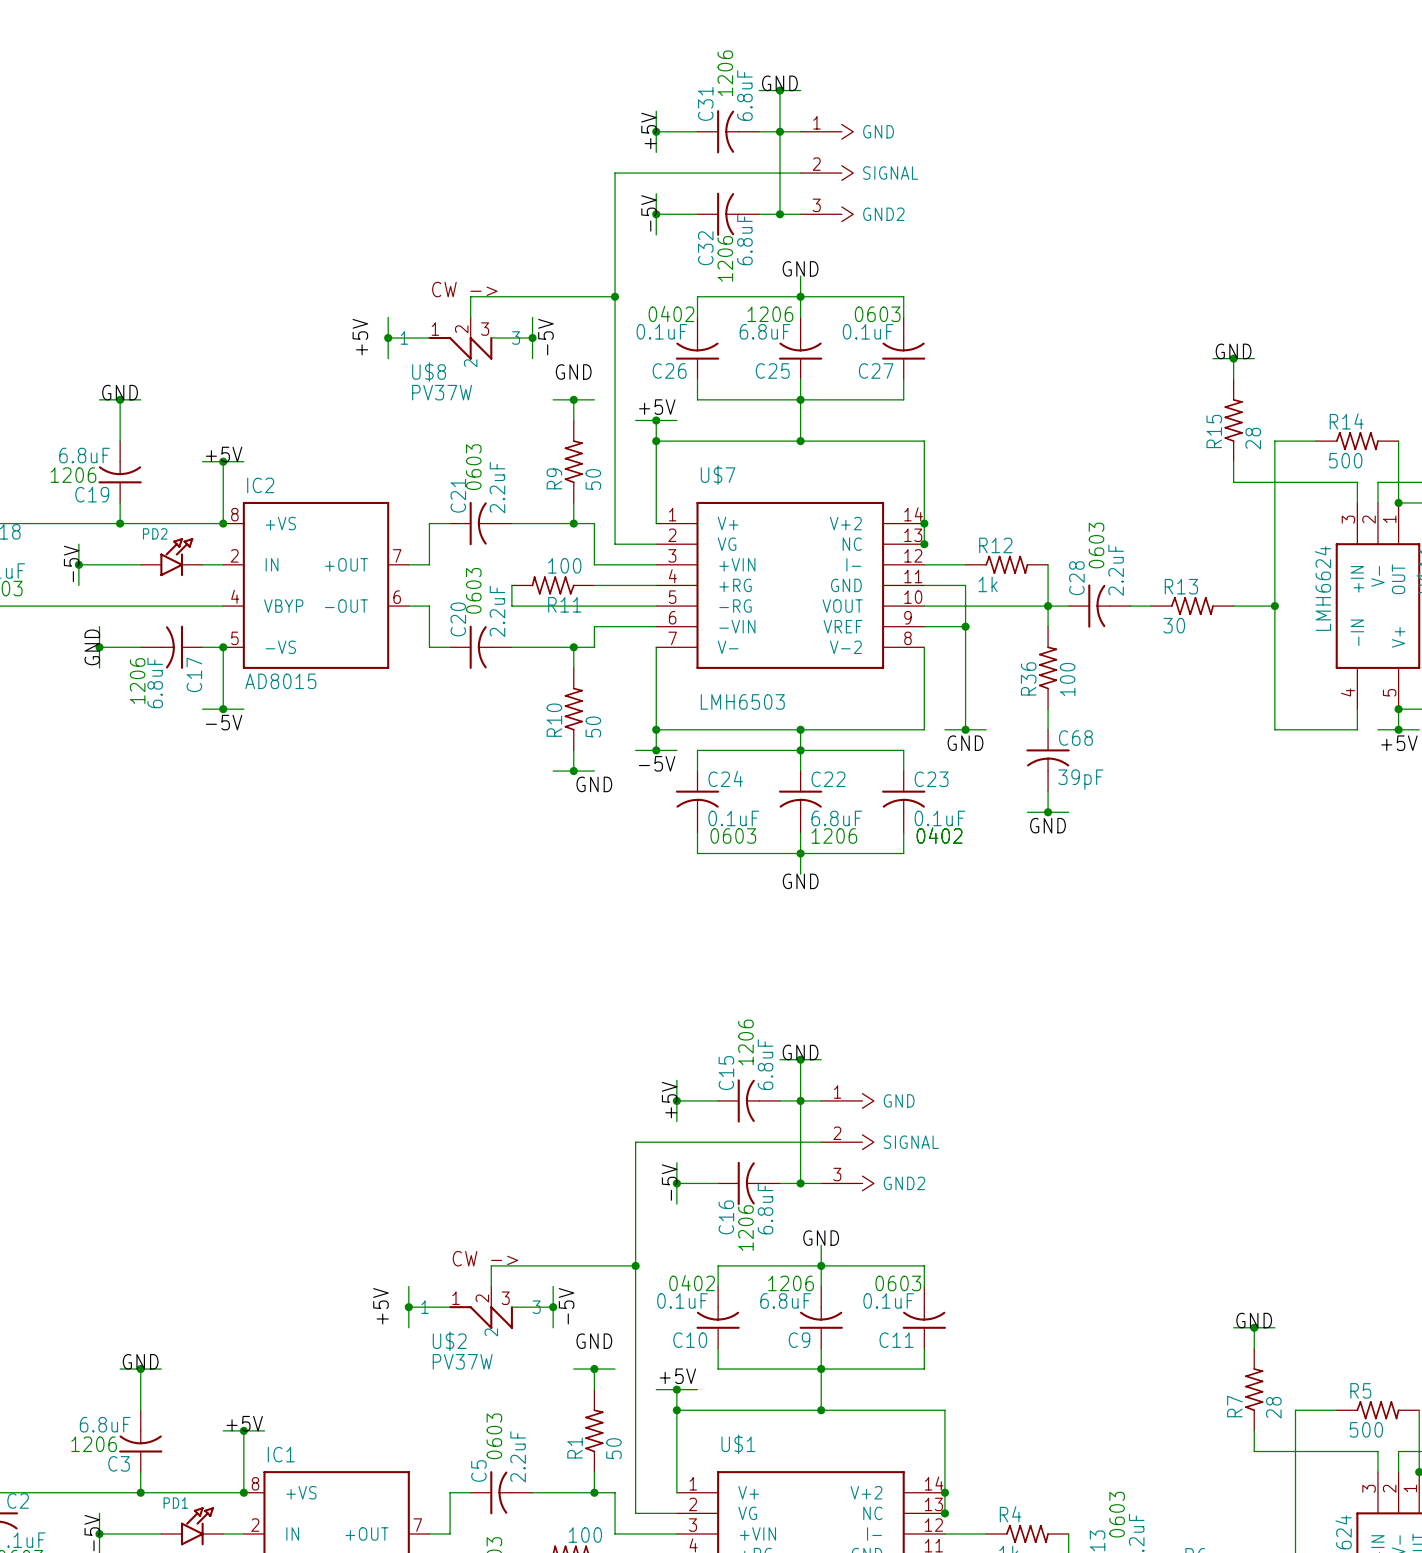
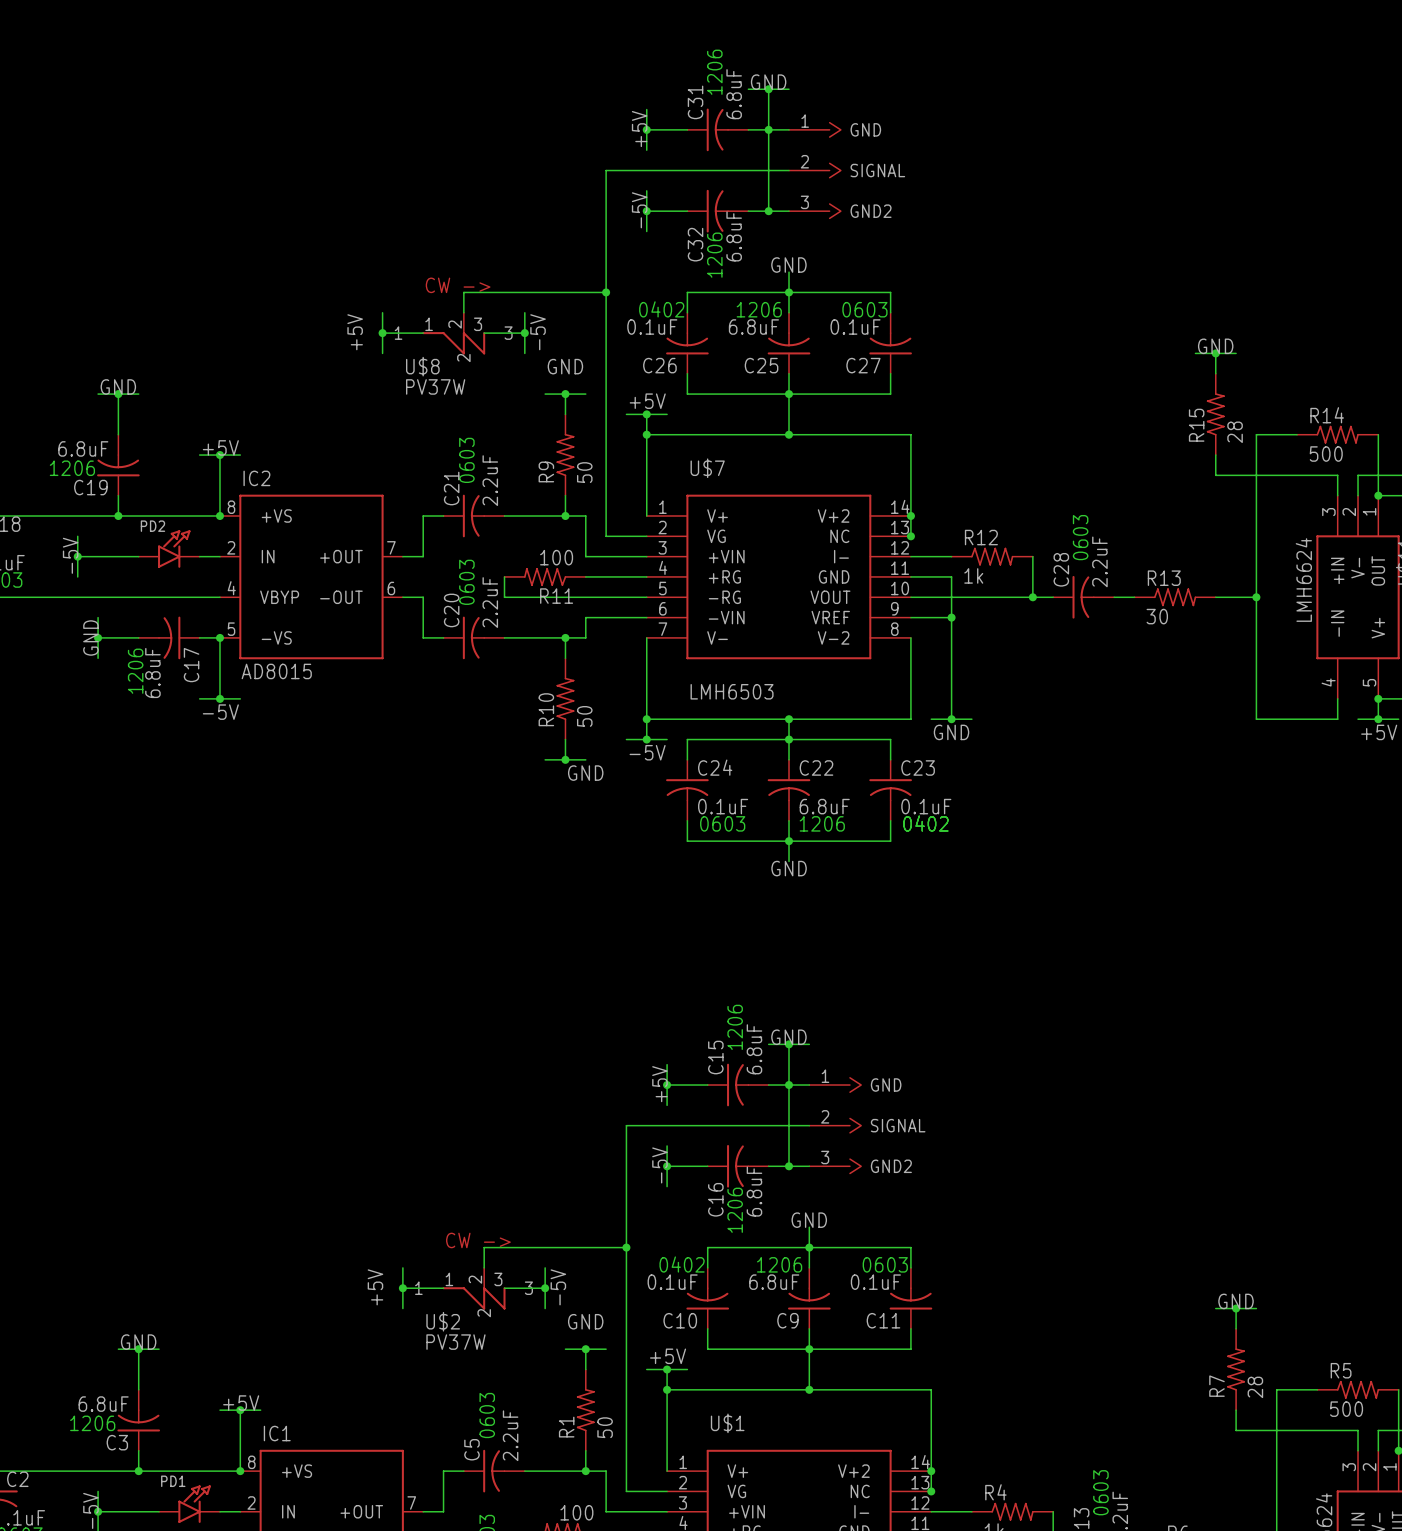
wire: (1048, 606) (1048, 626) -> none
R36: 100 (1048, 667) -> none
wire: (1048, 709) (1048, 729) -> none
C68: 39pF (1048, 760) -> none
wire: (1048, 791) (1048, 812) -> none
wire: (1027, 812) (1068, 812) -> none
junction: (1048, 812) -> none
label: GND (1047, 825) -> none

